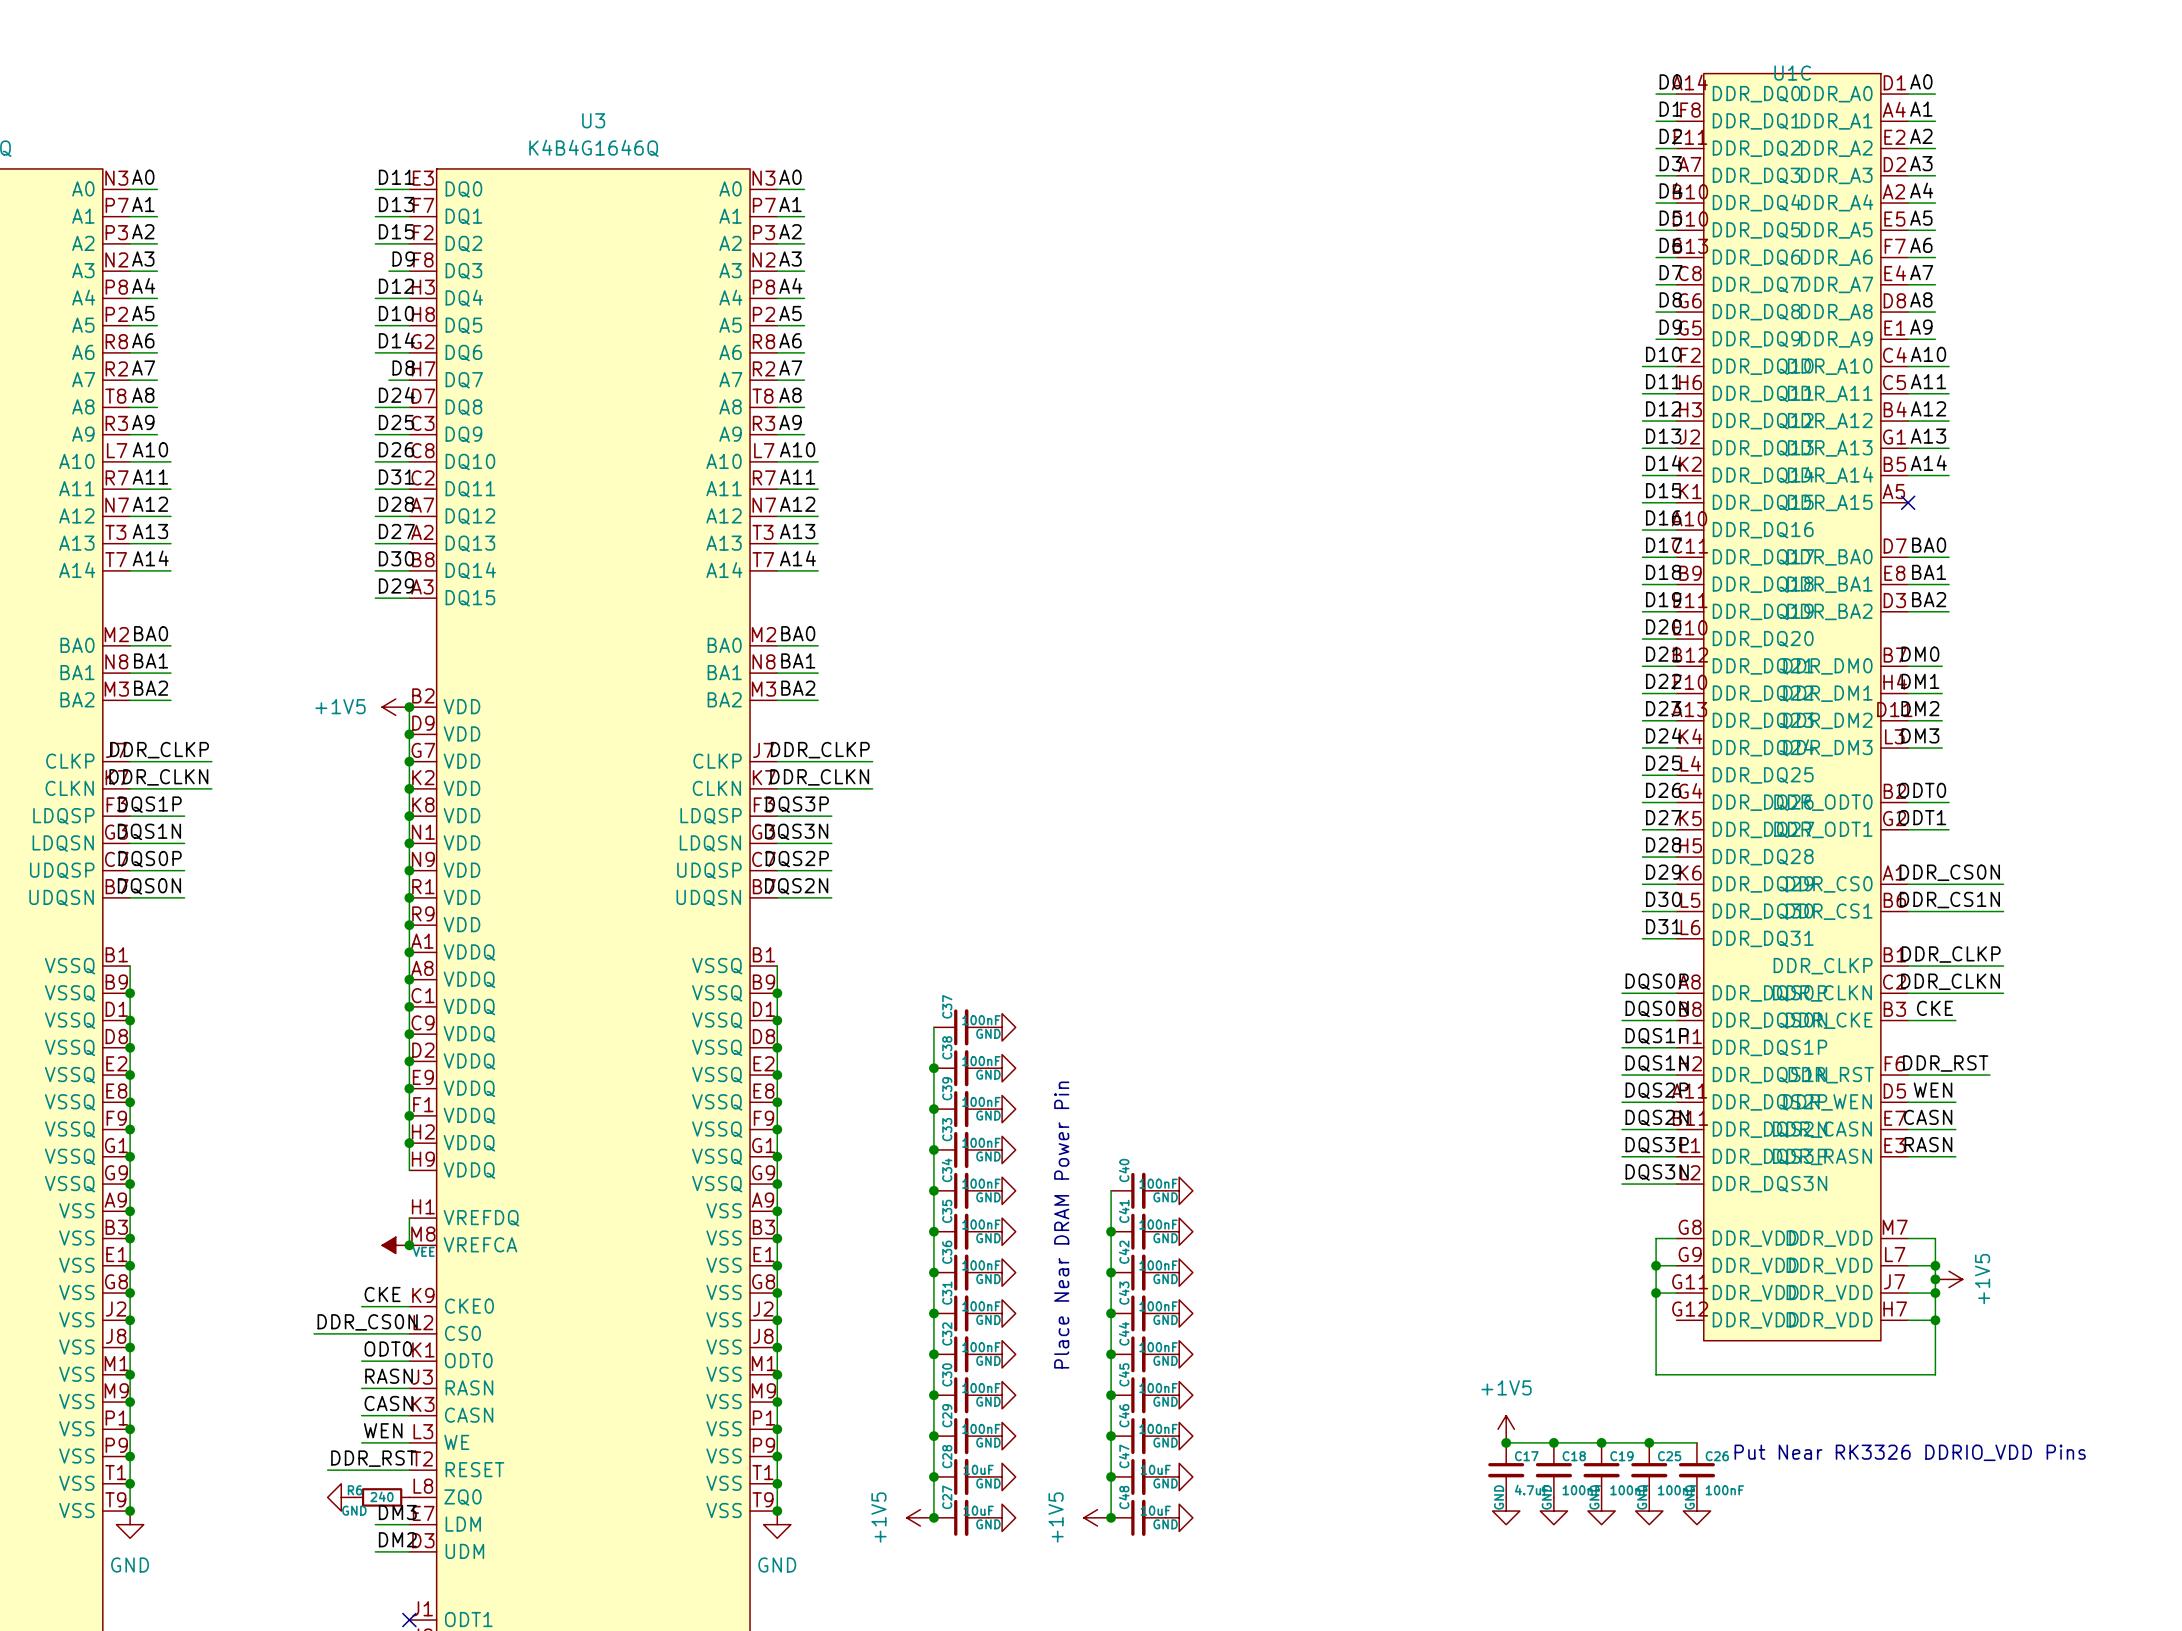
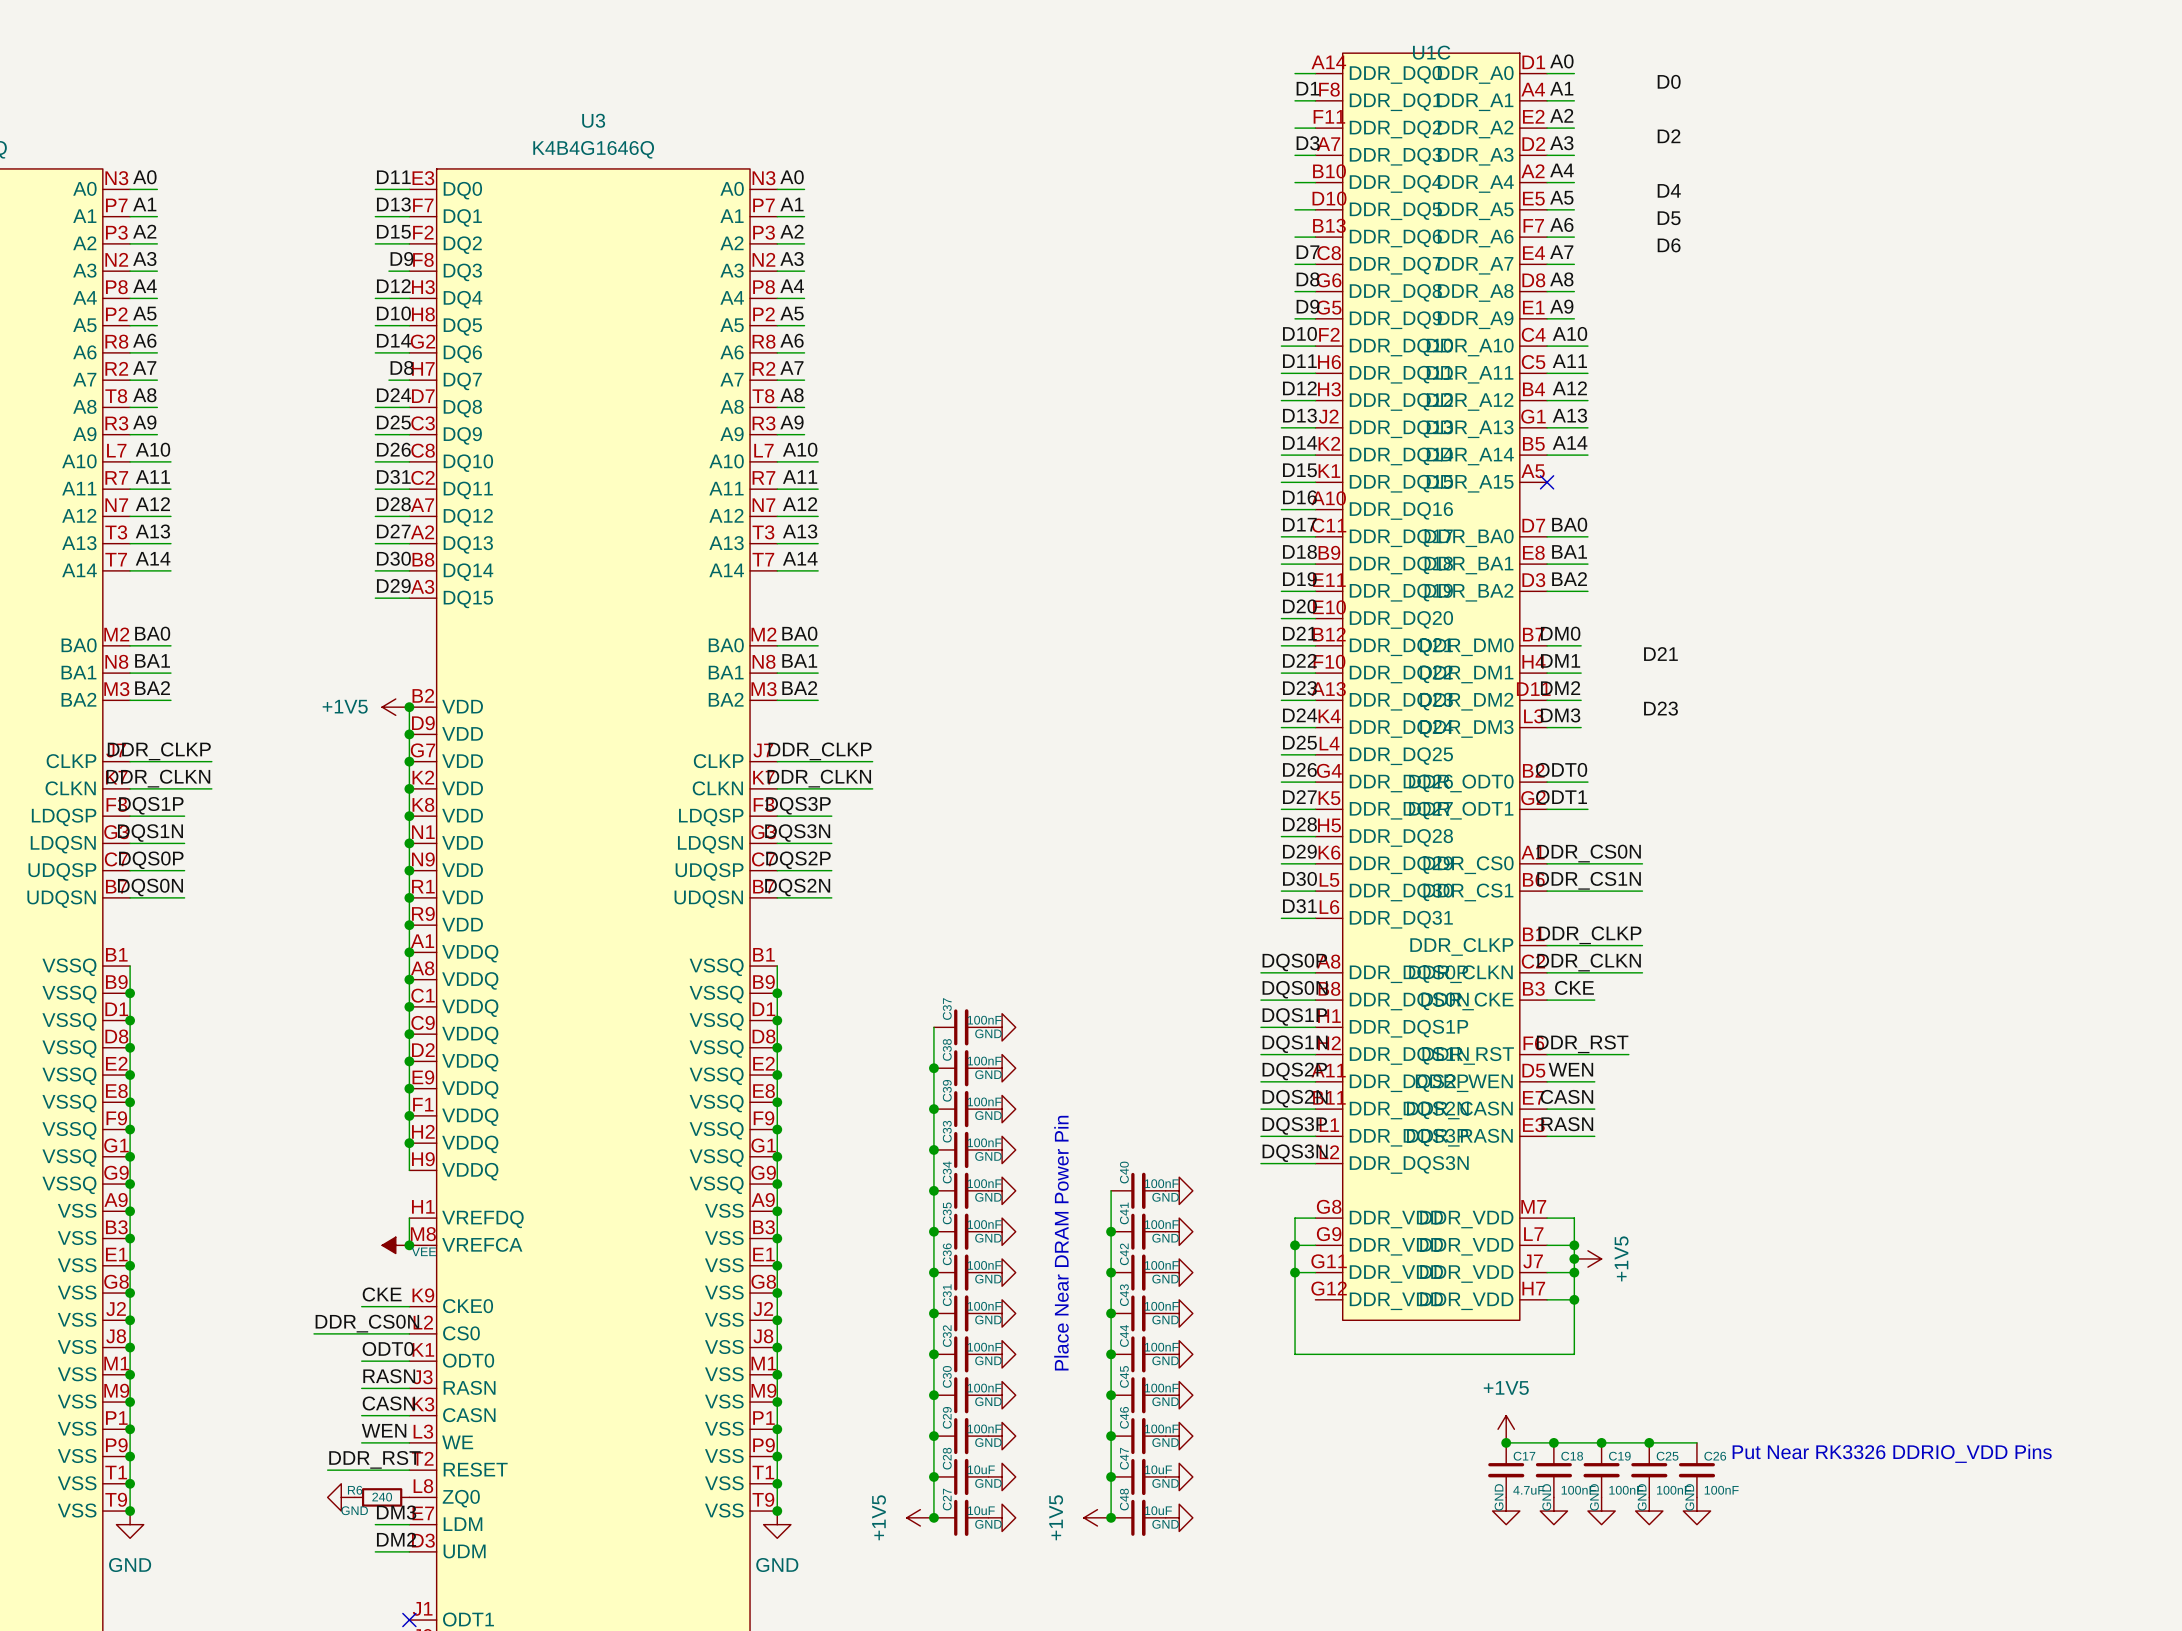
label: none -> A0 (1561, 61)
wire: none -> (1295, 73) (1315, 73)
wire: none -> (1547, 73) (1574, 73)
label: A0 (1921, 81) -> none
label: none -> D1 (1308, 88)
label: none -> A1 (1561, 88)
wire: (1656, 94) (1676, 94) -> none
wire: (1908, 94) (1935, 94) -> none
wire: none -> (1295, 100) (1315, 100)
wire: none -> (1547, 100) (1574, 100)
label: D1 (1670, 109) -> none
label: A1 (1921, 109) -> none
label: none -> A2 (1561, 115)
wire: (1656, 121) (1676, 121) -> none
wire: (1908, 121) (1935, 121) -> none
wire: none -> (1295, 128) (1315, 128)
wire: none -> (1547, 128) (1574, 128)
label: A2 (1921, 136) -> none
label: none -> D3 (1308, 143)
label: none -> A3 (1561, 143)
wire: (1656, 148) (1676, 148) -> none
wire: (1908, 148) (1935, 148) -> none
wire: none -> (1295, 155) (1315, 155)
wire: none -> (1547, 155) (1574, 155)
label: D3 (1670, 163) -> none
label: A3 (1921, 163) -> none
label: none -> A4 (1561, 170)
wire: (1656, 175) (1676, 175) -> none
wire: (1908, 175) (1935, 175) -> none
wire: none -> (1295, 182) (1315, 182)
wire: none -> (1547, 182) (1574, 182)
label: A4 (1921, 190) -> none
label: none -> A5 (1561, 197)
wire: (1656, 203) (1676, 203) -> none
wire: (1908, 203) (1935, 203) -> none
wire: none -> (1295, 209) (1315, 209)
wire: none -> (1547, 209) (1574, 209)
label: A5 (1921, 218) -> none
label: none -> A6 (1561, 224)
wire: (1656, 230) (1676, 230) -> none
wire: (1908, 230) (1935, 230) -> none
wire: none -> (1295, 237) (1315, 237)
wire: none -> (1547, 237) (1574, 237)
label: A6 (1921, 245) -> none
label: none -> D7 (1307, 252)
label: none -> A7 (1561, 252)
wire: (1656, 257) (1676, 257) -> none
wire: (1908, 257) (1935, 257) -> none
wire: none -> (1295, 264) (1315, 264)
wire: none -> (1547, 264) (1574, 264)
label: D7 (1671, 272) -> none
label: A7 (1921, 272) -> none
label: none -> D8 (1308, 279)
label: none -> A8 (1561, 279)
wire: (1656, 284) (1676, 284) -> none
wire: (1908, 284) (1935, 284) -> none
wire: none -> (1295, 291) (1315, 291)
wire: none -> (1547, 291) (1574, 291)
label: D8 (1670, 299) -> none
label: A8 (1921, 299) -> none
label: none -> D9 (1308, 306)
label: none -> A9 (1561, 306)
wire: (1656, 312) (1676, 312) -> none
wire: (1908, 312) (1935, 312) -> none
wire: none -> (1295, 318) (1315, 318)
wire: none -> (1547, 318) (1574, 318)
label: D9 (1670, 327) -> none
label: A9 (1921, 327) -> none
label: none -> D10 (1299, 333)
label: none -> A10 (1569, 333)
wire: (1656, 339) (1676, 339) -> none
wire: (1908, 339) (1935, 339) -> none
wire: none -> (1281, 346) (1315, 346)
wire: none -> (1547, 346) (1587, 346)
label: D10 (1663, 354) -> none
label: A10 (1928, 354) -> none
label: none -> D11 (1299, 361)
label: none -> A11 (1569, 361)
wire: (1642, 366) (1676, 366) -> none
wire: (1908, 366) (1949, 366) -> none
wire: none -> (1281, 373) (1315, 373)
wire: none -> (1547, 373) (1587, 373)
label: D11 (1663, 381) -> none
label: A11 (1928, 381) -> none
label: none -> D12 (1299, 388)
label: none -> A12 (1569, 388)
wire: (1642, 393) (1676, 393) -> none
wire: (1908, 393) (1949, 393) -> none
wire: none -> (1281, 400) (1315, 400)
wire: none -> (1547, 400) (1587, 400)
label: D12 (1663, 408) -> none
label: A12 (1928, 408) -> none
label: none -> D13 (1299, 415)
label: none -> A13 (1569, 415)
wire: (1642, 421) (1676, 421) -> none
wire: (1908, 421) (1949, 421) -> none
wire: none -> (1281, 427) (1315, 427)
wire: none -> (1547, 427) (1587, 427)
label: D13 (1663, 436) -> none
label: A13 (1928, 436) -> none
label: none -> D14 (1300, 442)
label: none -> A14 (1570, 442)
wire: (1642, 448) (1676, 448) -> none
wire: (1908, 448) (1949, 448) -> none
wire: none -> (1281, 455) (1315, 455)
wire: none -> (1547, 455) (1587, 455)
label: D14 (1663, 463) -> none
label: A14 (1928, 463) -> none
label: none -> D15 (1299, 470)
wire: (1642, 475) (1676, 475) -> none
wire: (1908, 475) (1949, 475) -> none
wire: none -> (1281, 482) (1315, 482)
no-connect mark: none -> (1547, 482)
label: D15 (1663, 490) -> none
label: none -> D16 (1299, 497)
wire: (1642, 502) (1676, 502) -> none
no-connect mark: (1908, 502) -> none
wire: none -> (1281, 509) (1315, 509)
label: D16 (1663, 517) -> none
label: none -> D17 (1299, 524)
label: none -> BA0 (1569, 524)
wire: (1642, 530) (1676, 530) -> none
wire: none -> (1281, 536) (1315, 536)
wire: none -> (1547, 536) (1587, 536)
label: D17 (1663, 545) -> none
label: BA0 (1929, 545) -> none
label: none -> D18 (1299, 551)
label: none -> BA1 (1569, 551)
wire: (1642, 557) (1676, 557) -> none
wire: (1908, 557) (1949, 557) -> none
wire: none -> (1281, 564) (1315, 564)
wire: none -> (1547, 564) (1587, 564)
label: D18 (1663, 572) -> none
label: BA1 (1929, 572) -> none
label: none -> D19 (1299, 579)
label: none -> BA2 (1569, 579)
wire: (1642, 584) (1676, 584) -> none
wire: (1908, 584) (1949, 584) -> none
wire: none -> (1281, 591) (1315, 591)
wire: none -> (1547, 591) (1587, 591)
label: D19 (1663, 599) -> none
label: BA2 (1929, 599) -> none
label: none -> D20 (1299, 606)
wire: (1642, 611) (1676, 611) -> none
wire: (1908, 611) (1949, 611) -> none
wire: none -> (1281, 618) (1315, 618)
label: D20 (1663, 626) -> none
label: none -> D21 (1299, 633)
label: none -> DM0 (1560, 633)
wire: (1642, 639) (1676, 639) -> (1547, 645) (1581, 645)
wire: none -> (1281, 645) (1315, 645)
label: DM0 (1920, 654) -> none
label: none -> D22 (1299, 660)
label: none -> DM1 (1560, 660)
wire: (1642, 666) (1676, 666) -> (1547, 673) (1581, 673)
wire: (1908, 666) (1942, 666) -> none
wire: none -> (1281, 673) (1315, 673)
label: D22 (1663, 681) -> none
label: DM1 (1920, 681) -> none
label: none -> D23 (1299, 688)
label: none -> DM2 (1560, 688)
wire: (1642, 693) (1676, 693) -> (1547, 700) (1581, 700)
wire: (1908, 693) (1942, 693) -> none
wire: none -> (1281, 700) (1315, 700)
U1C position: (1792, 707) -> (1431, 686)
label: DM2 (1920, 708) -> none
label: none -> D24 (1300, 715)
label: none -> DM3 (1560, 715)
wire: (1642, 720) (1676, 720) -> (1547, 727) (1581, 727)
wire: (1908, 720) (1942, 720) -> none
wire: none -> (1281, 727) (1315, 727)
label: D24 (1663, 735) -> none
label: DM3 (1920, 735) -> none
label: none -> D25 (1299, 742)
wire: (1642, 748) (1676, 748) -> none
wire: (1908, 748) (1942, 748) -> none
wire: none -> (1281, 754) (1315, 754)
label: D25 (1663, 763) -> none
label: none -> D26 (1299, 769)
label: none -> ODT0 (1561, 769)
wire: (1642, 775) (1676, 775) -> none
wire: none -> (1281, 782) (1315, 782)
wire: none -> (1547, 782) (1587, 782)
label: D26 (1663, 790) -> none
label: ODT0 (1922, 790) -> none
label: none -> D27 (1299, 797)
label: none -> ODT1 (1561, 797)
wire: (1642, 802) (1676, 802) -> none
wire: (1908, 802) (1949, 802) -> none
wire: none -> (1281, 809) (1315, 809)
wire: none -> (1547, 809) (1587, 809)
label: D27 (1663, 817) -> none
label: ODT1 (1922, 817) -> none
label: none -> D28 (1299, 824)
wire: (1642, 829) (1676, 829) -> none
wire: (1908, 829) (1949, 829) -> none
wire: none -> (1281, 836) (1315, 836)
label: D28 (1663, 844) -> DDR_CS0N (1589, 853)
label: none -> D29 (1299, 851)
wire: (1642, 857) (1676, 857) -> none
wire: none -> (1281, 863) (1315, 863)
wire: none -> (1547, 863) (1642, 863)
label: D29 (1663, 872) -> DDR_CS1N (1589, 880)
label: DDR_CS0N (1949, 872) -> none
label: none -> D30 (1299, 878)
wire: (1642, 884) (1676, 884) -> none
wire: (1908, 884) (2003, 884) -> none
wire: none -> (1281, 891) (1315, 891)
wire: none -> (1547, 891) (1642, 891)
label: D30 (1663, 899) -> none
label: DDR_CS1N (1949, 900) -> none
label: none -> D31 (1299, 906)
wire: (1642, 911) (1676, 911) -> none
wire: (1908, 911) (2003, 911) -> none
wire: none -> (1281, 918) (1315, 918)
label: D31 (1663, 926) -> DDR_CLKP (1589, 935)
wire: (1642, 938) (1676, 938) -> none
wire: none -> (1547, 945) (1642, 945)
label: DDR_CLKP (1951, 954) -> none
label: none -> DQS0P (1294, 962)
label: none -> DDR_CLKN (1589, 962)
wire: (1908, 966) (2003, 966) -> none
wire: none -> (1260, 972) (1315, 972)
wire: none -> (1547, 972) (1642, 972)
label: DQS0P (1657, 981) -> none
label: DDR_CLKN (1950, 981) -> none
label: none -> CKE (1574, 987)
label: none -> DQS0N (1295, 989)
wire: (1622, 993) (1676, 993) -> none
wire: (1908, 993) (2003, 993) -> none
wire: none -> (1260, 1000) (1315, 1000)
wire: none -> (1547, 1000) (1594, 1000)
label: CKE (1934, 1008) -> none
label: DQS0N (1657, 1009) -> none
label: none -> DQS1P (1294, 1016)
wire: (1622, 1020) (1676, 1020) -> none
wire: (1908, 1020) (1955, 1020) -> none
wire: none -> (1260, 1027) (1315, 1027)
label: DQS1P (1657, 1036) -> DDR_RST (1582, 1044)
label: none -> DQS1N (1295, 1044)
wire: (1622, 1047) (1676, 1047) -> none
wire: none -> (1260, 1054) (1315, 1054)
wire: none -> (1547, 1054) (1628, 1054)
label: DQS1N (1657, 1063) -> none
label: DDR_RST (1945, 1063) -> none
label: none -> WEN (1570, 1069)
label: none -> DQS2P (1294, 1071)
wire: (1622, 1075) (1676, 1075) -> none
wire: (1908, 1075) (1989, 1075) -> none
wire: none -> (1260, 1081) (1315, 1081)
wire: none -> (1547, 1081) (1594, 1081)
label: DQS2P (1657, 1090) -> none
label: WEN (1933, 1090) -> none
label: none -> CASN (1566, 1096)
label: none -> DQS2N (1295, 1098)
wire: (1622, 1102) (1676, 1102) -> none
wire: (1908, 1102) (1955, 1102) -> none
wire: none -> (1260, 1109) (1315, 1109)
wire: none -> (1547, 1109) (1594, 1109)
label: CASN (1928, 1117) -> none
label: DQS2N (1657, 1118) -> none
label: none -> DQS3P (1294, 1125)
label: none -> RASN (1567, 1124)
wire: (1622, 1129) (1676, 1129) -> none
wire: (1908, 1129) (1955, 1129) -> none
wire: none -> (1260, 1136) (1315, 1136)
wire: none -> (1547, 1136) (1594, 1136)
label: RASN (1928, 1144) -> none
label: DQS3P (1657, 1145) -> none
label: none -> DQS3N (1295, 1153)
wire: (1622, 1156) (1676, 1156) -> none
wire: (1908, 1156) (1955, 1156) -> none
wire: none -> (1260, 1163) (1315, 1163)
label: DQS3N (1657, 1172) -> none
wire: (1622, 1184) (1676, 1184) -> none
wire: none -> (1315, 1218) (1295, 1218) (1295, 1354) (1574, 1354) (1574, 1218) (1547, 1218)
wire: (1676, 1238) (1656, 1238) (1656, 1374) (1935, 1374) (1935, 1238) (1908, 1238) -> none
wire: none -> (1295, 1245) (1315, 1245)
junction: none -> (1295, 1245)
wire: none -> (1547, 1245) (1574, 1245)
junction: none -> (1574, 1245)
junction: none -> (1574, 1258)
power symbol: none -> +1V5 (1587, 1258)
wire: (1656, 1265) (1676, 1265) -> none
junction: (1656, 1265) -> none
wire: (1908, 1265) (1935, 1265) -> none
junction: (1935, 1265) -> none
wire: none -> (1295, 1272) (1315, 1272)
junction: none -> (1295, 1272)
wire: none -> (1547, 1272) (1574, 1272)
junction: none -> (1574, 1272)
junction: (1935, 1279) -> none
power symbol: +1V5 (1949, 1279) -> none
wire: (1656, 1293) (1676, 1293) -> none
junction: (1656, 1293) -> none
wire: (1908, 1293) (1935, 1293) -> none
junction: (1935, 1293) -> none
wire: none -> (1547, 1299) (1574, 1299)
junction: none -> (1574, 1299)
wire: (1908, 1320) (1935, 1320) -> none
junction: (1935, 1320) -> none

